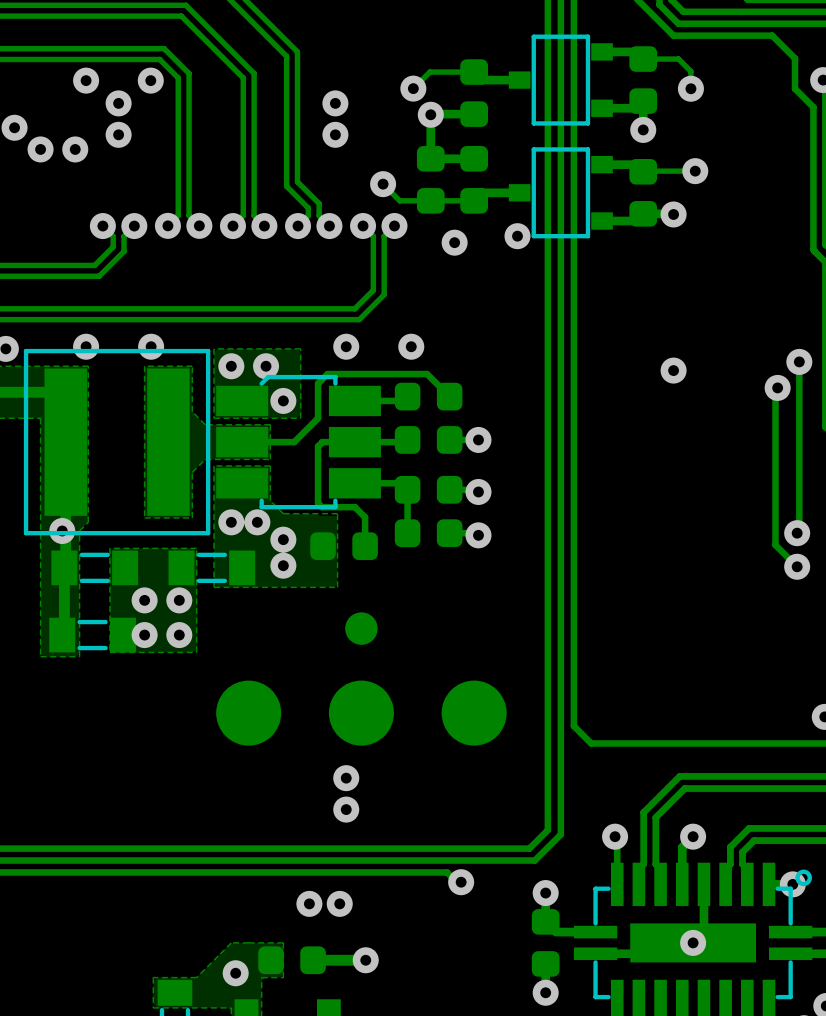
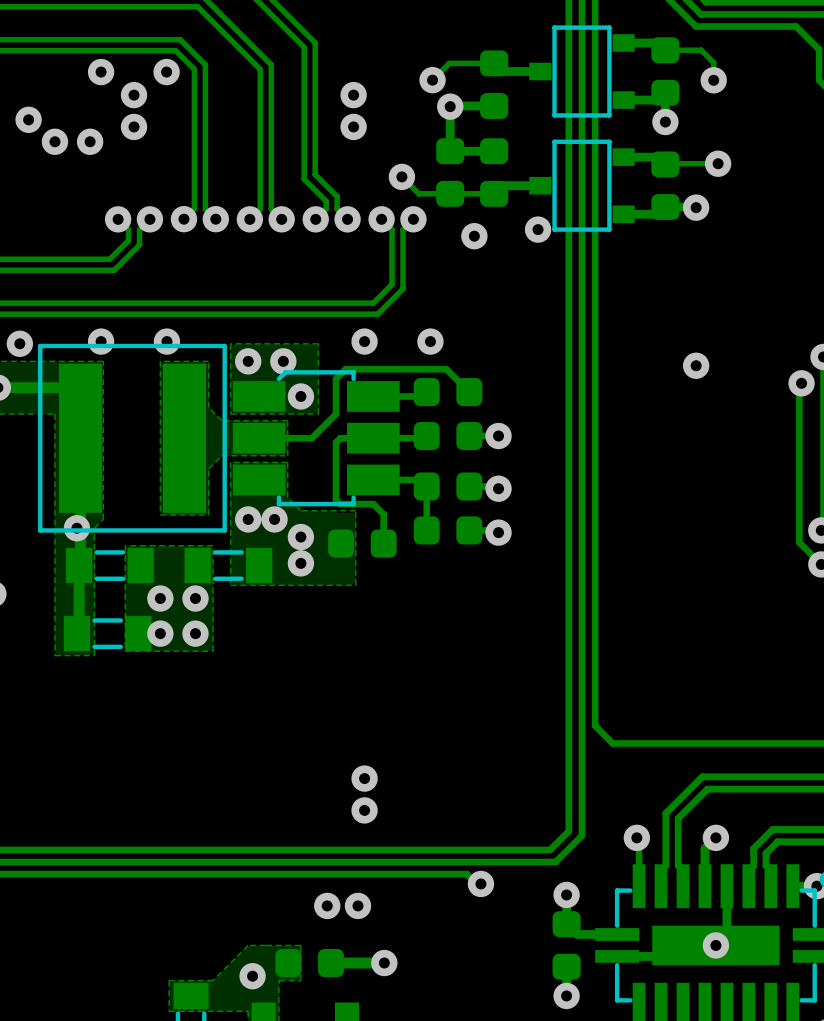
part: (361, 628) -> none
part: (248, 713) -> none
part: (361, 713) -> none
part: (474, 713) -> none

